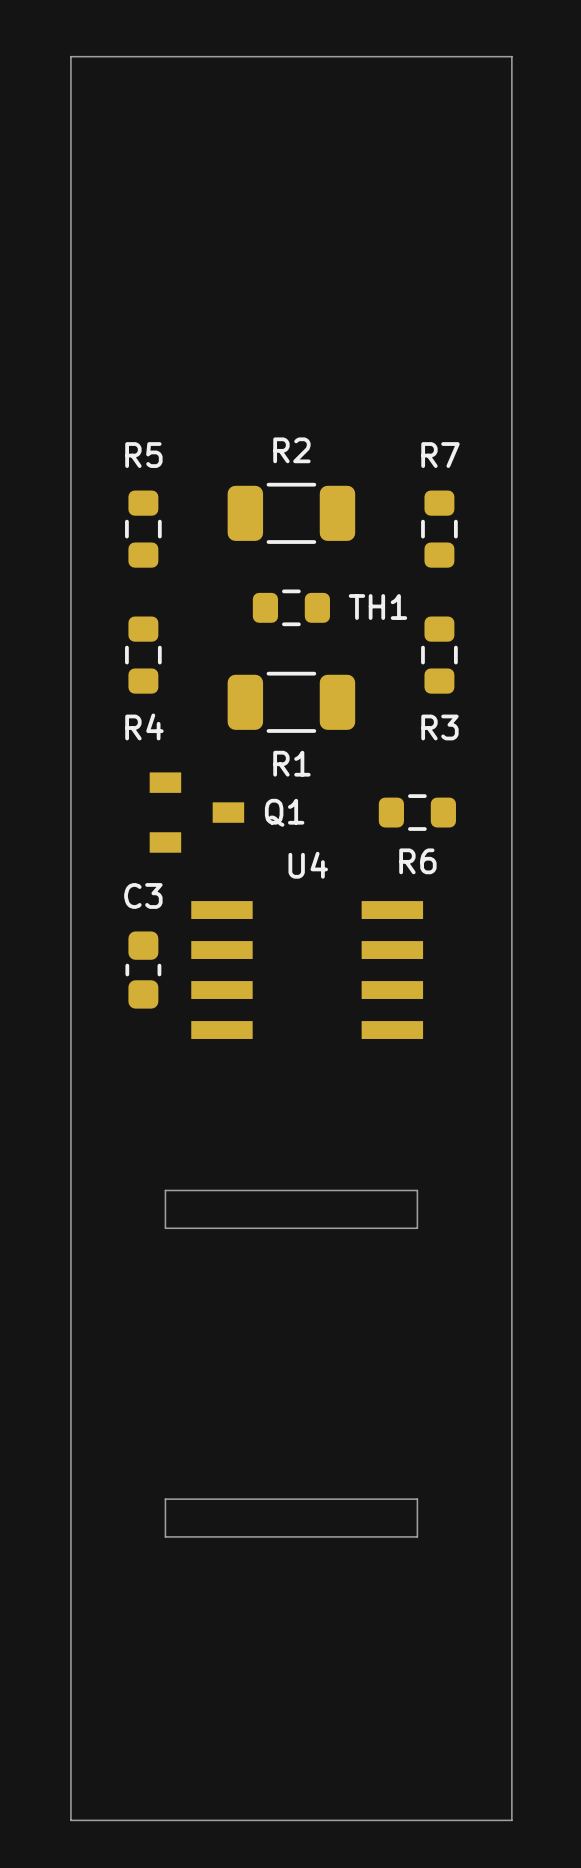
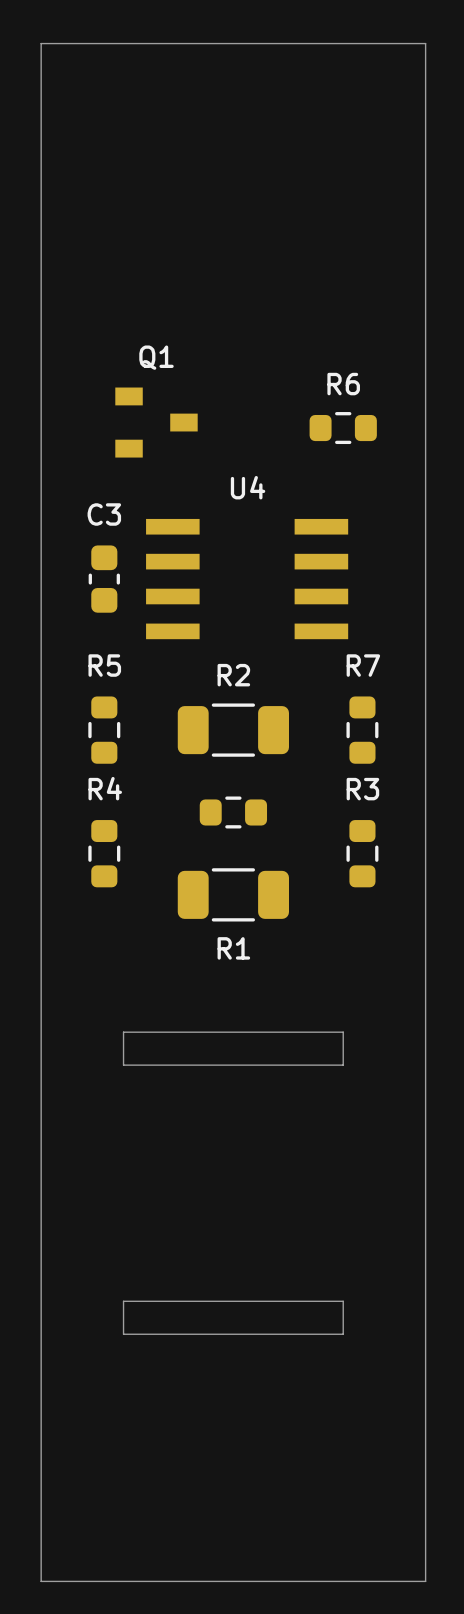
R2 position: (291, 513) -> (233, 730)
R5 position: (143, 529) -> (104, 730)
R7 position: (439, 529) -> (362, 730)
TH1: (291, 607) -> none
R4 position: (143, 655) -> (104, 853)
R3 position: (439, 655) -> (362, 853)
R1 position: (291, 702) -> (233, 894)
R4 name position: R4 (144, 726) -> R4 (105, 788)
R3 name position: R3 (439, 727) -> R3 (362, 789)
Q1 position: (196, 812) -> (156, 422)
Q1 name position: Q1 (284, 812) -> Q1 (156, 357)
R6 position: (417, 812) -> (343, 428)
R6 name position: R6 (417, 861) -> R6 (343, 384)
part: none -> (233, 812)
C3 position: (143, 970) -> (104, 579)
U4 position: (307, 970) -> (247, 579)

